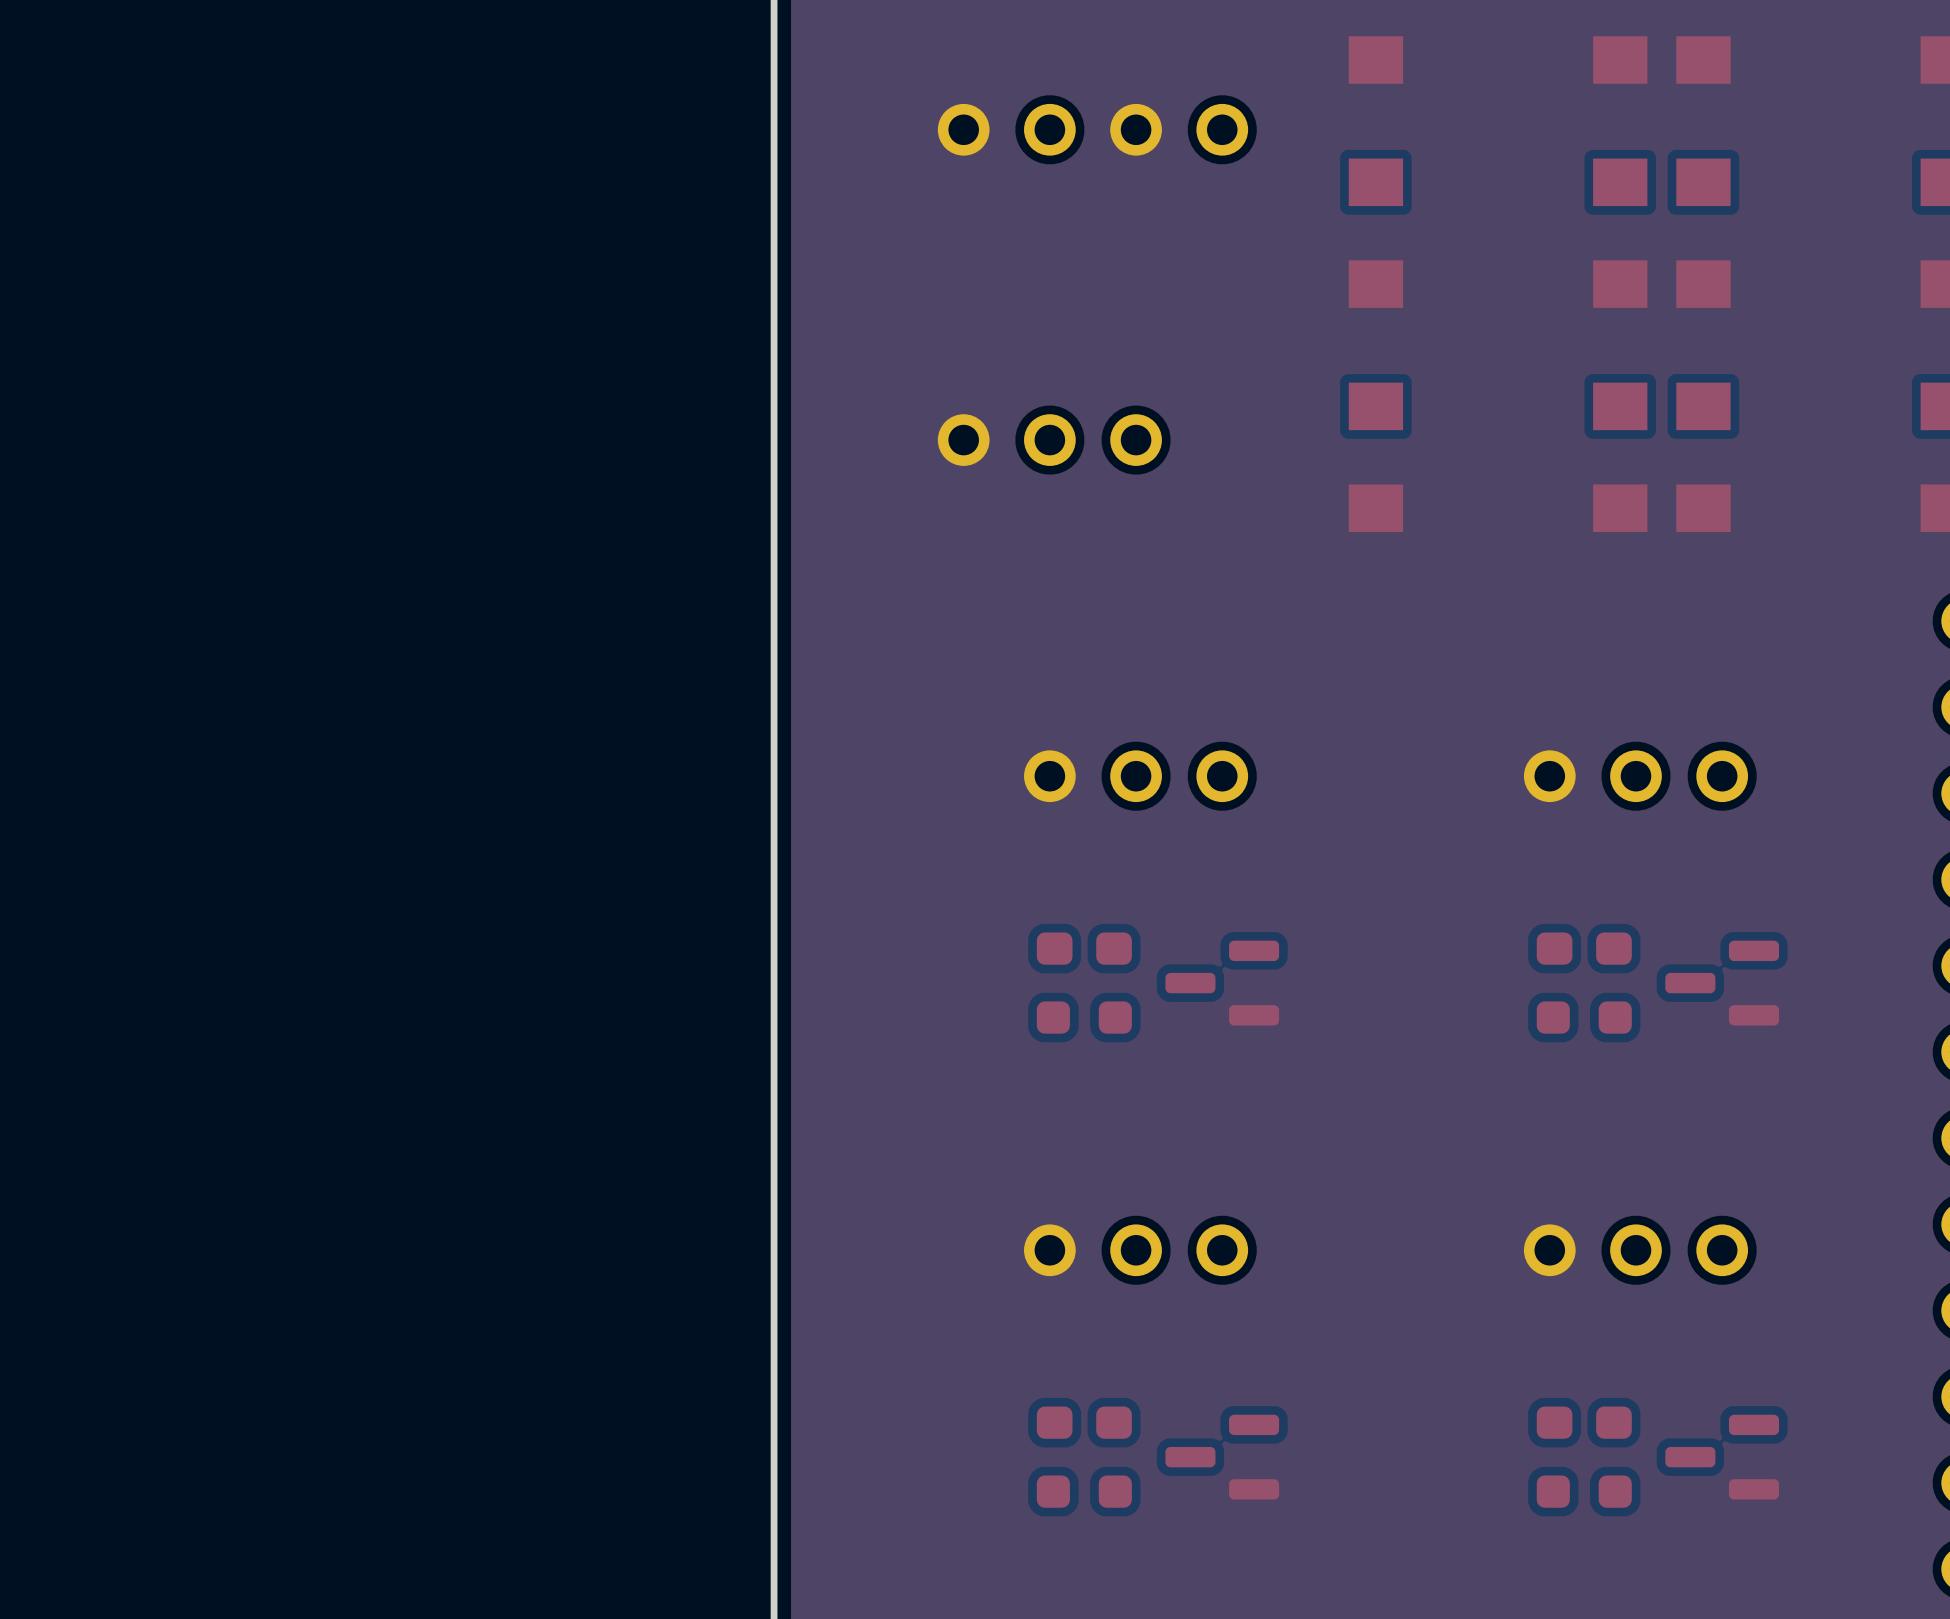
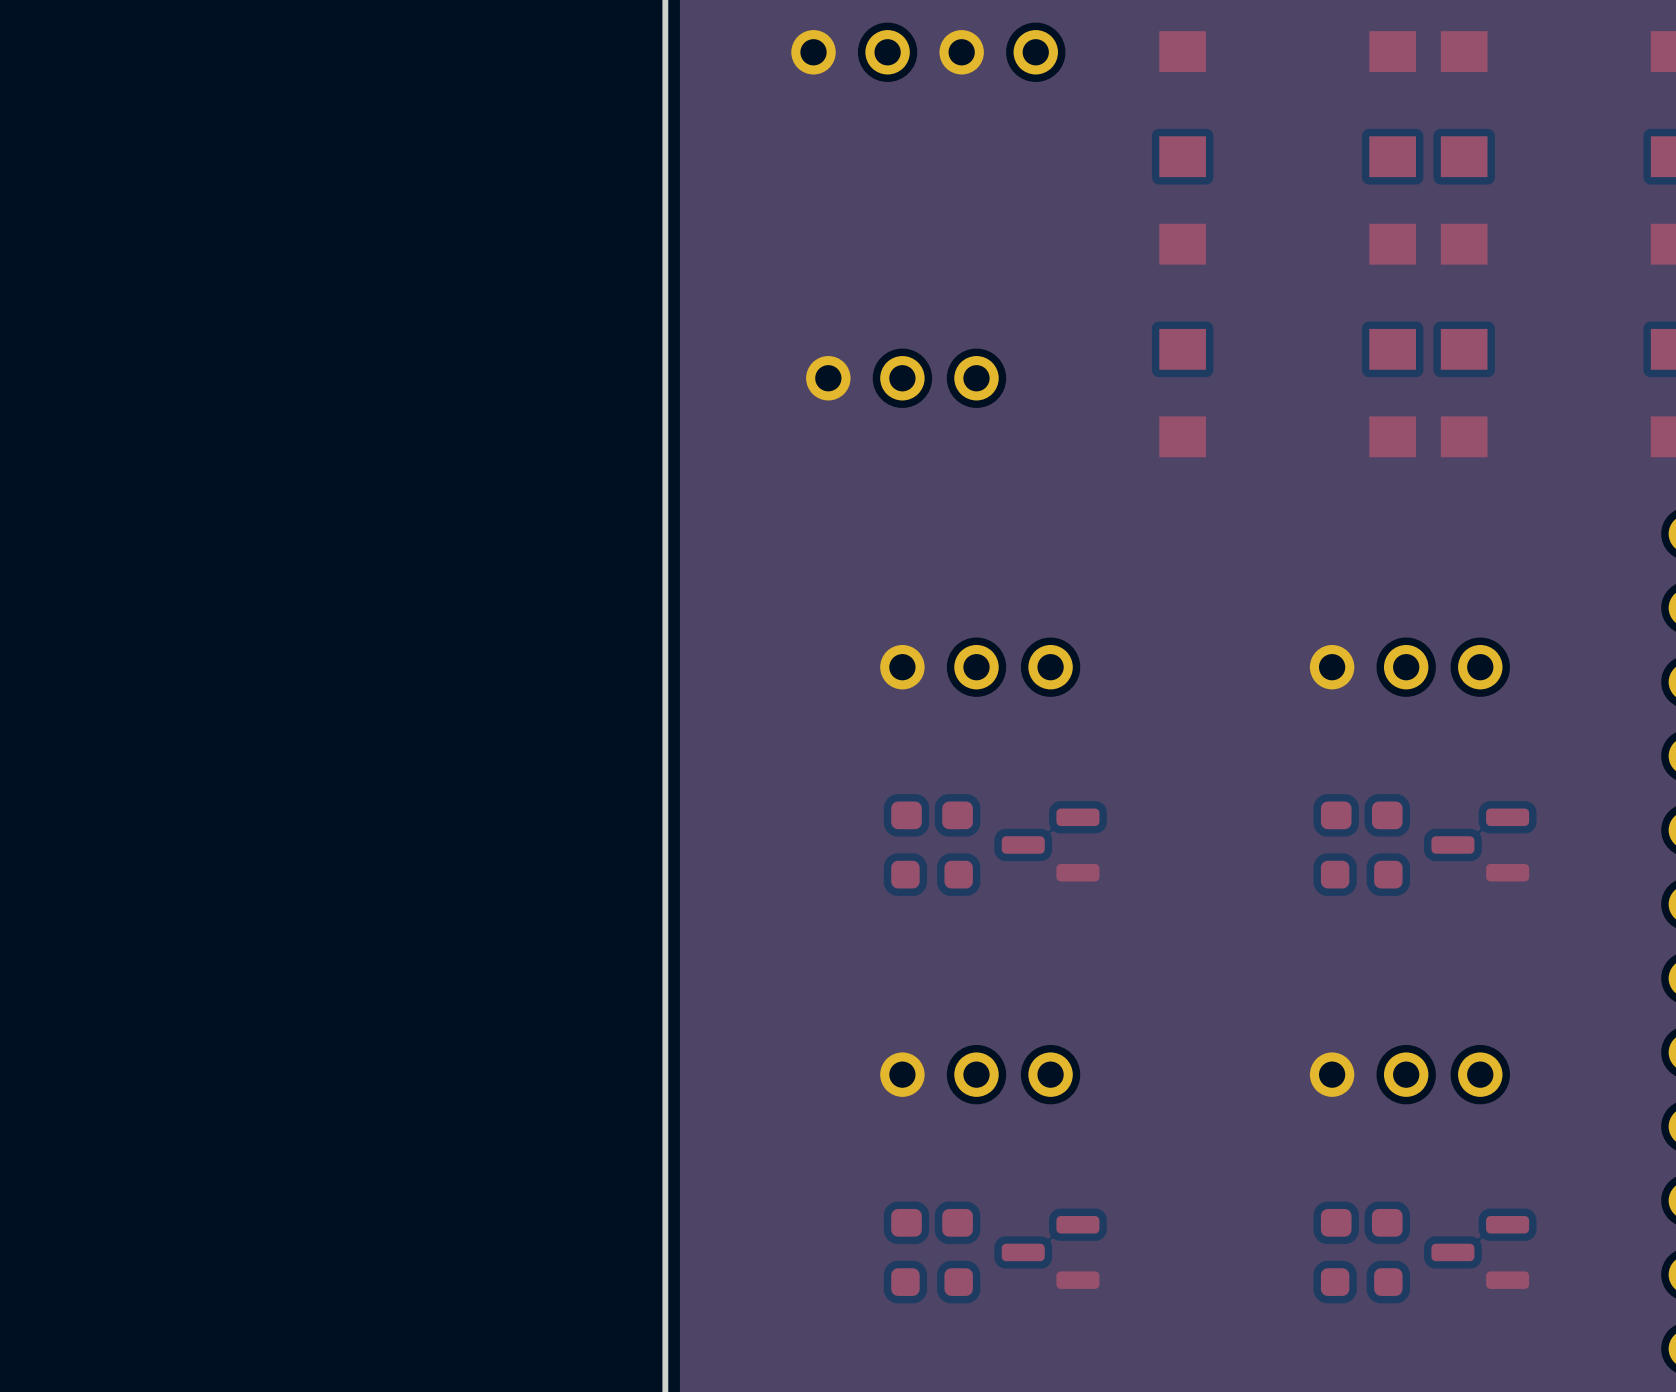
part position: (1092, 129) -> (924, 52)

